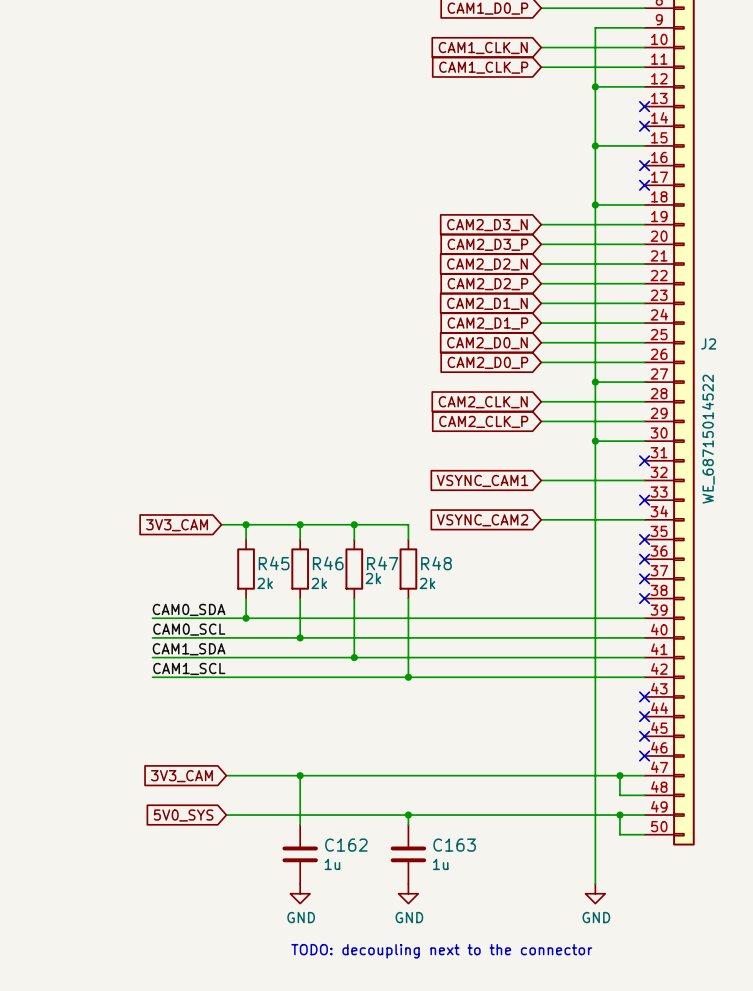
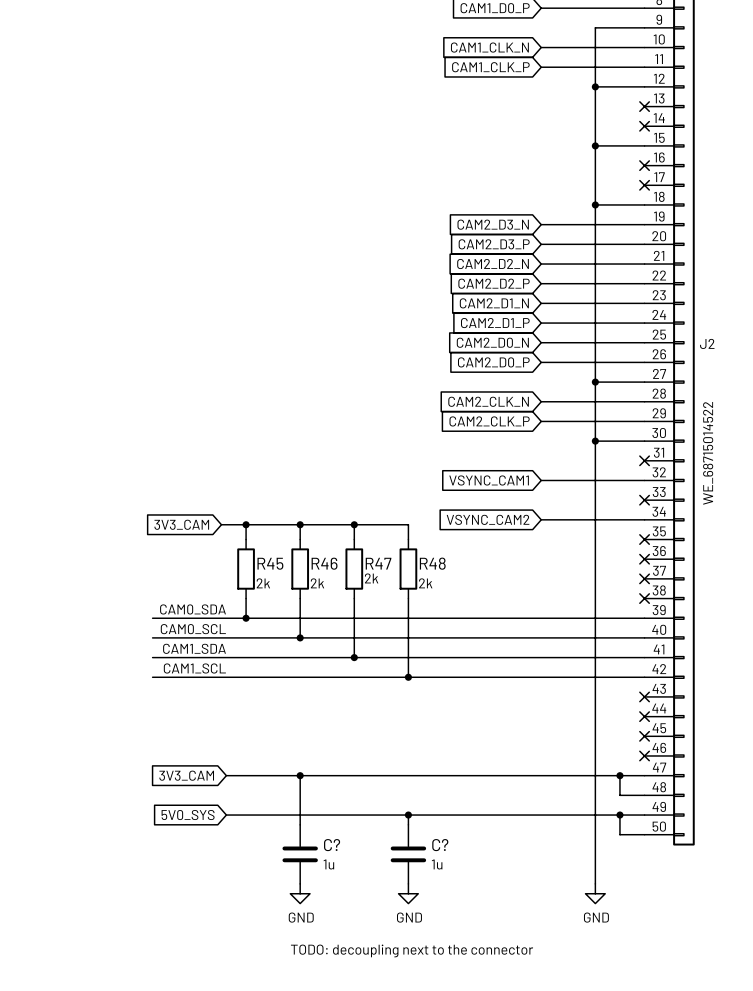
C162 name: C162 (346, 845) -> C? (332, 845)
C163 name: C163 (454, 845) -> C? (440, 845)

